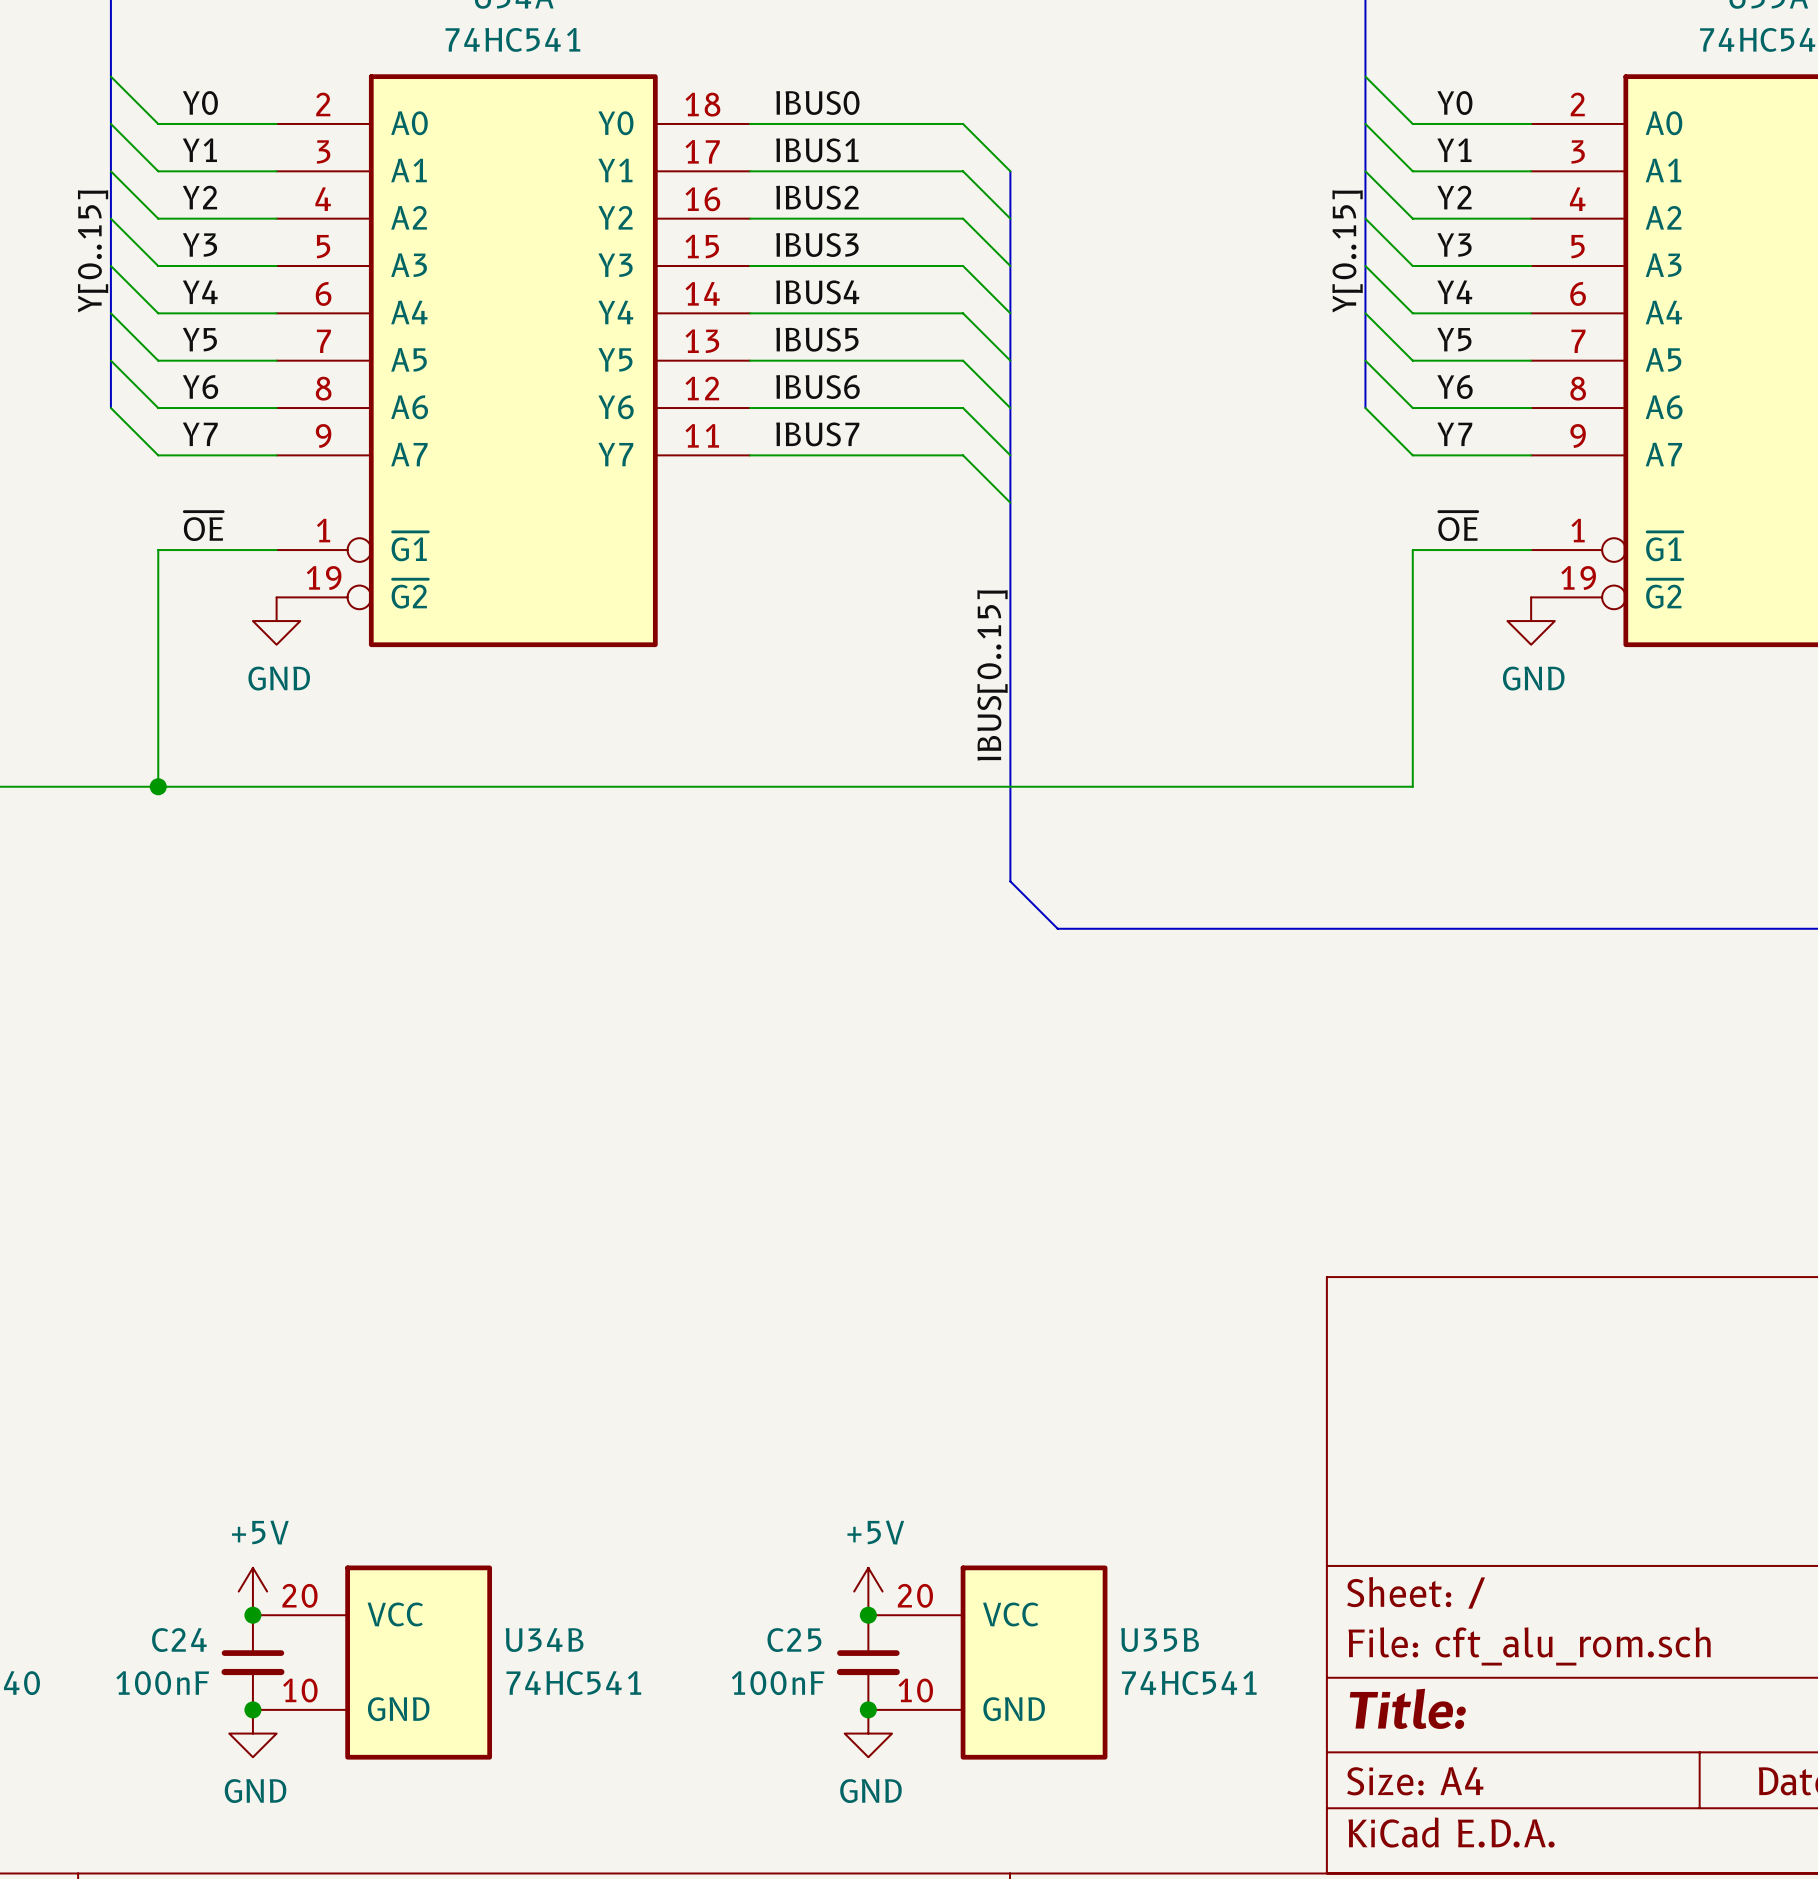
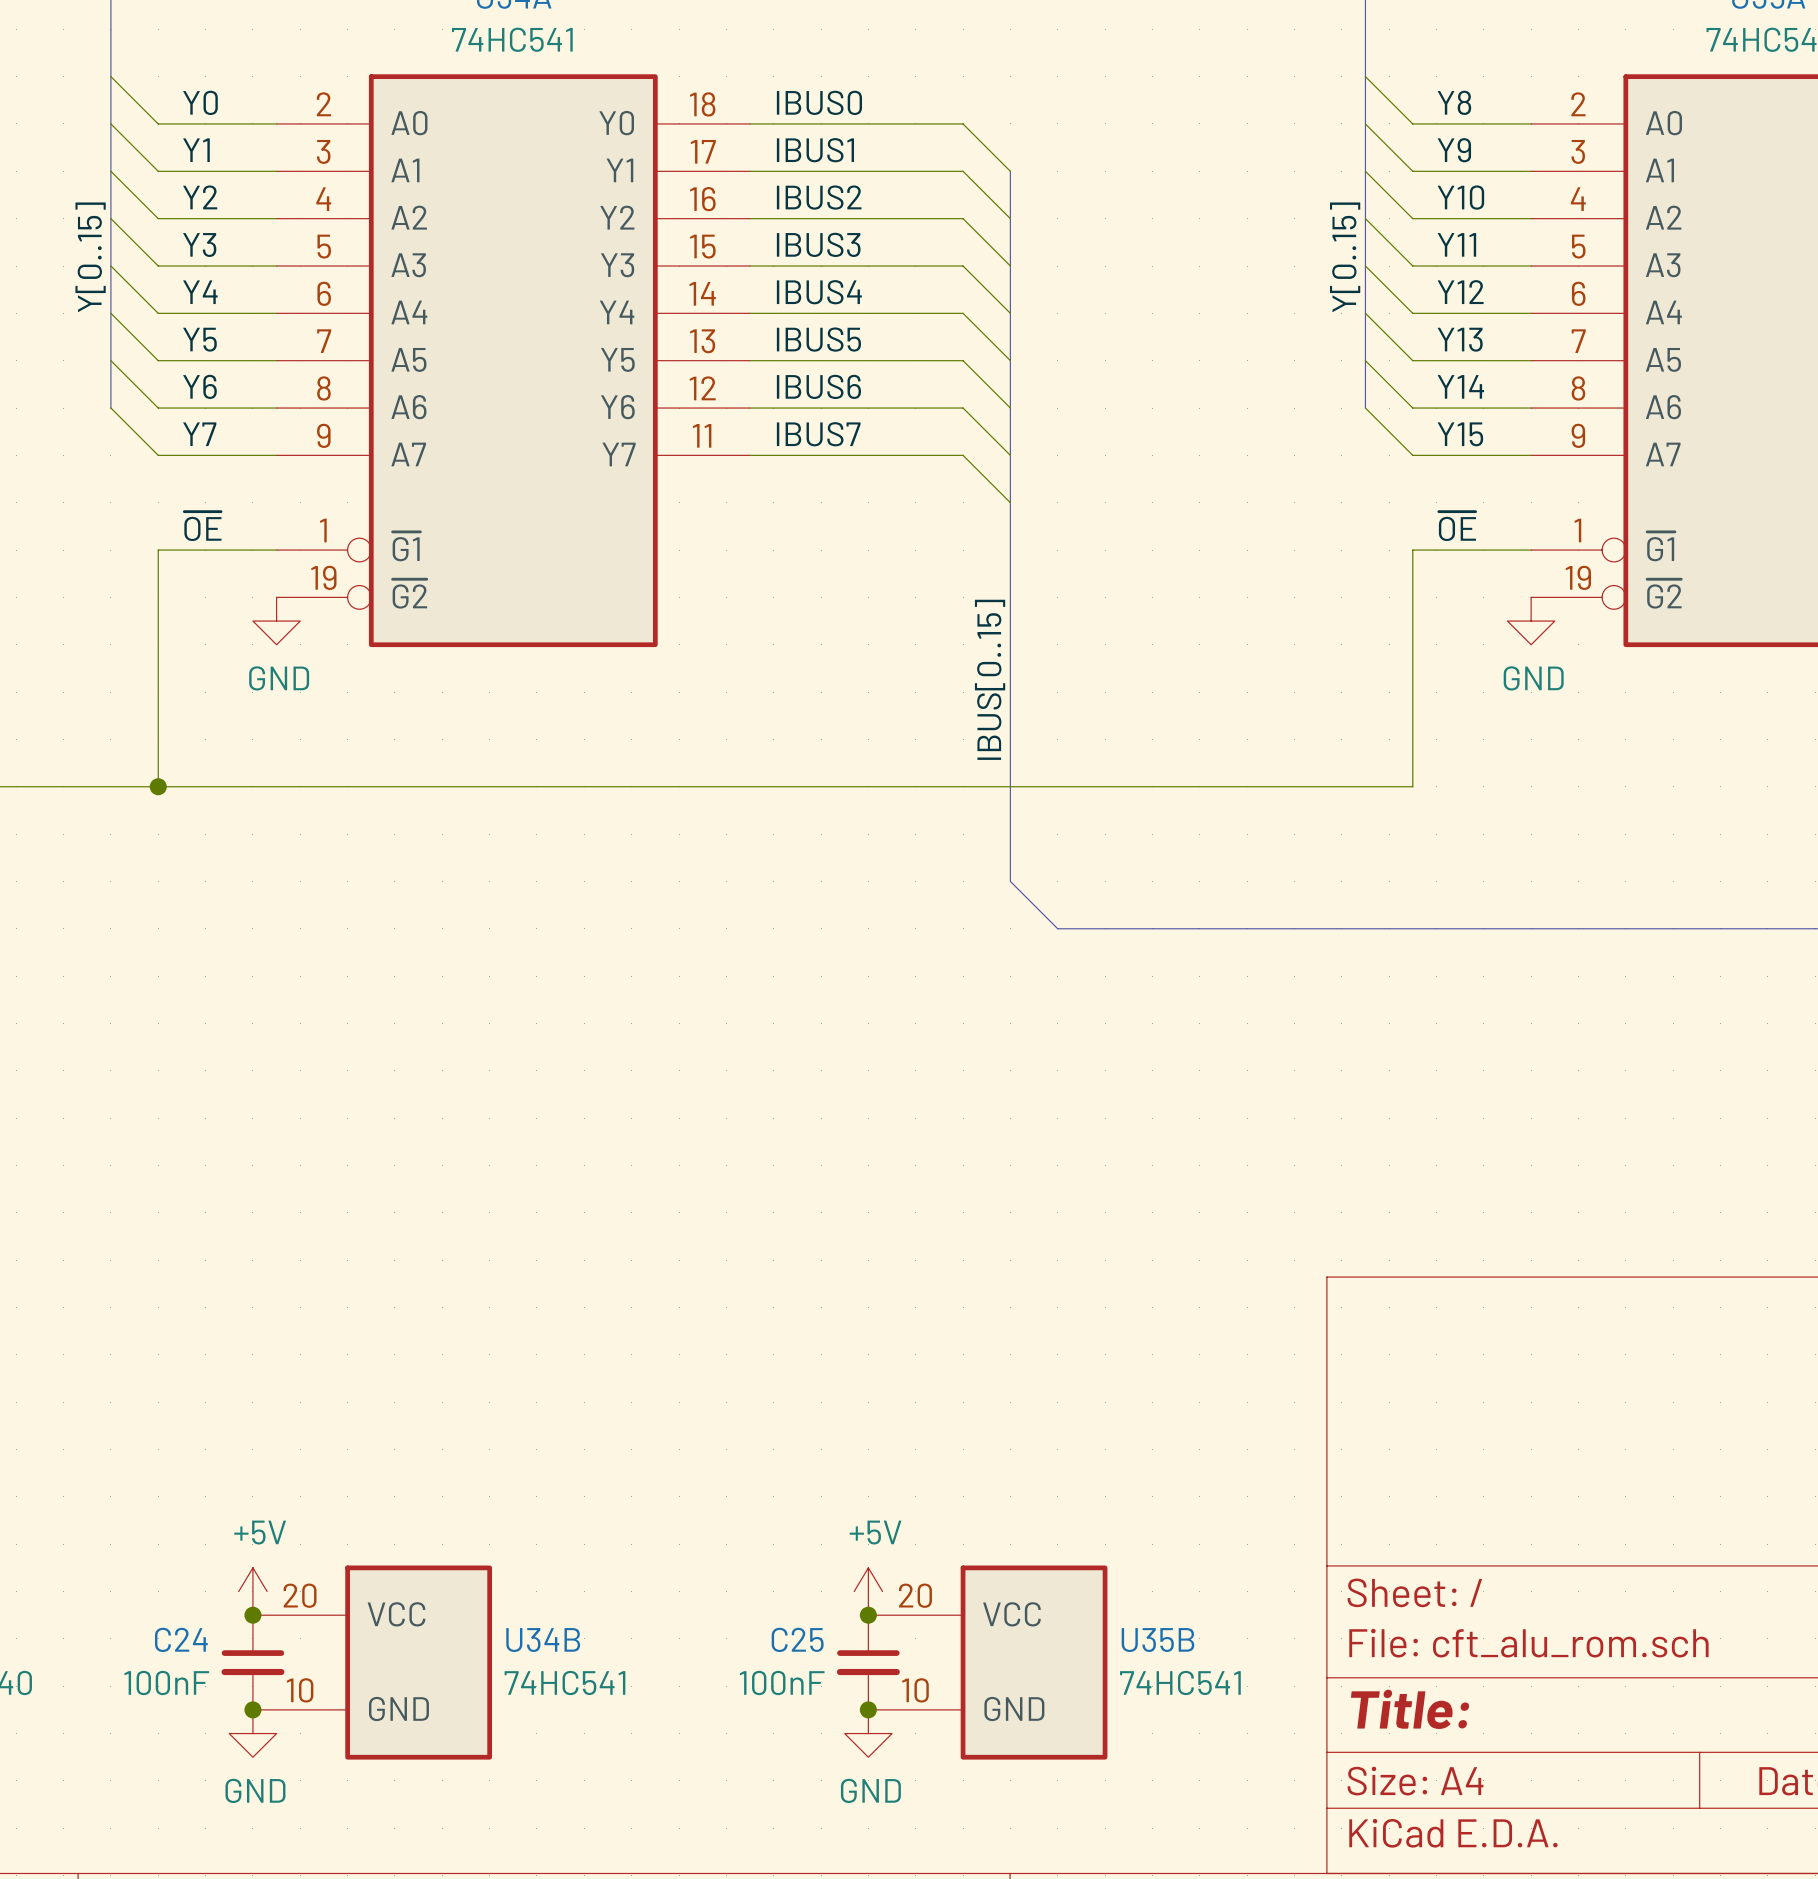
label: Y0 (1454, 102) -> Y8 (1454, 102)
label: Y1 (1454, 150) -> Y9 (1454, 150)
label: Y2 (1454, 197) -> Y10 (1460, 197)
label: Y3 (1454, 244) -> Y11 (1456, 244)
label: Y4 (1454, 292) -> Y12 (1460, 292)
label: Y5 (1454, 339) -> Y13 (1460, 339)
label: Y6 (1455, 387) -> Y14 (1460, 386)
label: Y7 (1454, 434) -> Y15 (1460, 434)

